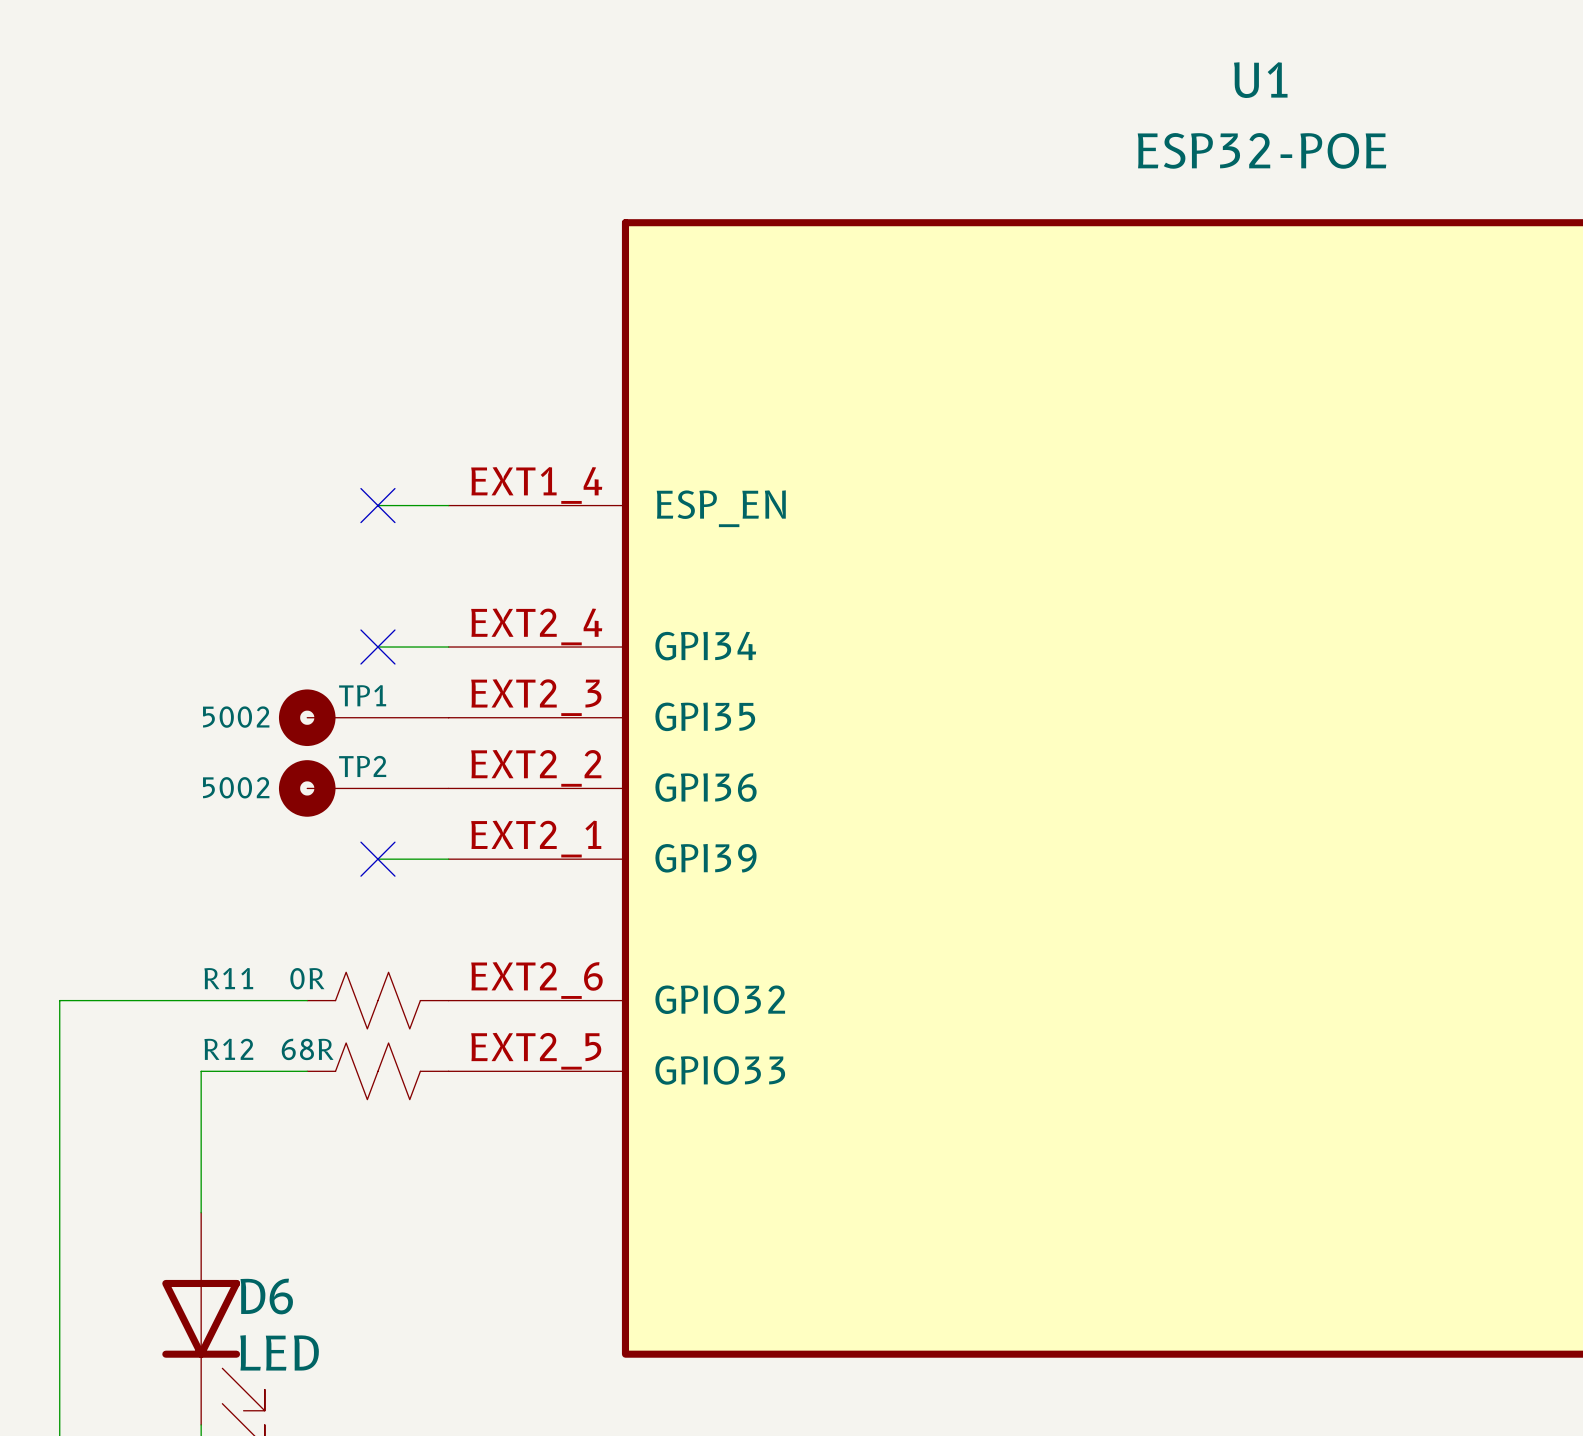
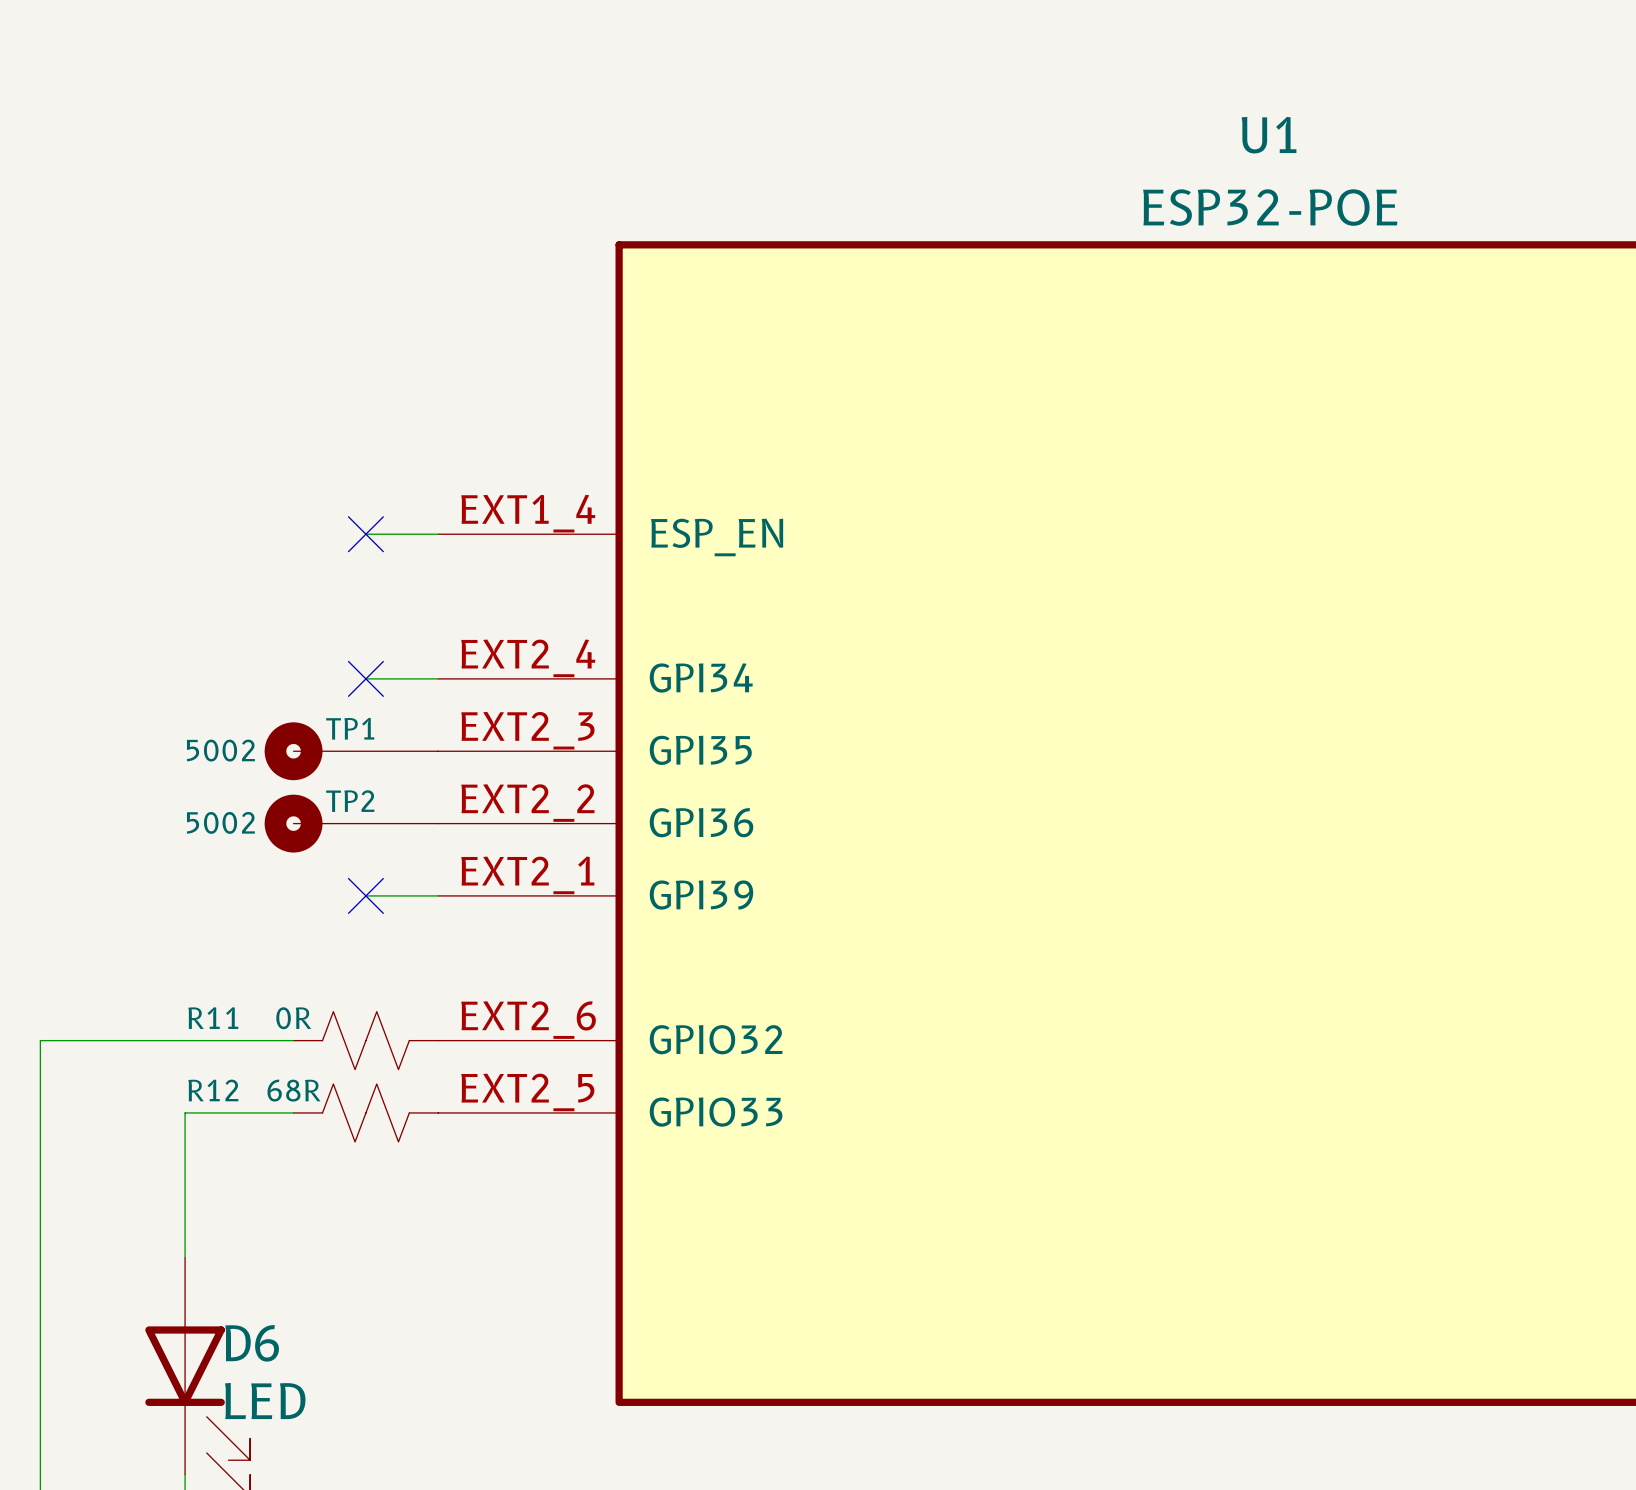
U1 name position: U1 (1260, 80) -> U1 (1269, 135)
U1 value position: ESP32-POE (1262, 150) -> ESP32-POE (1270, 207)

